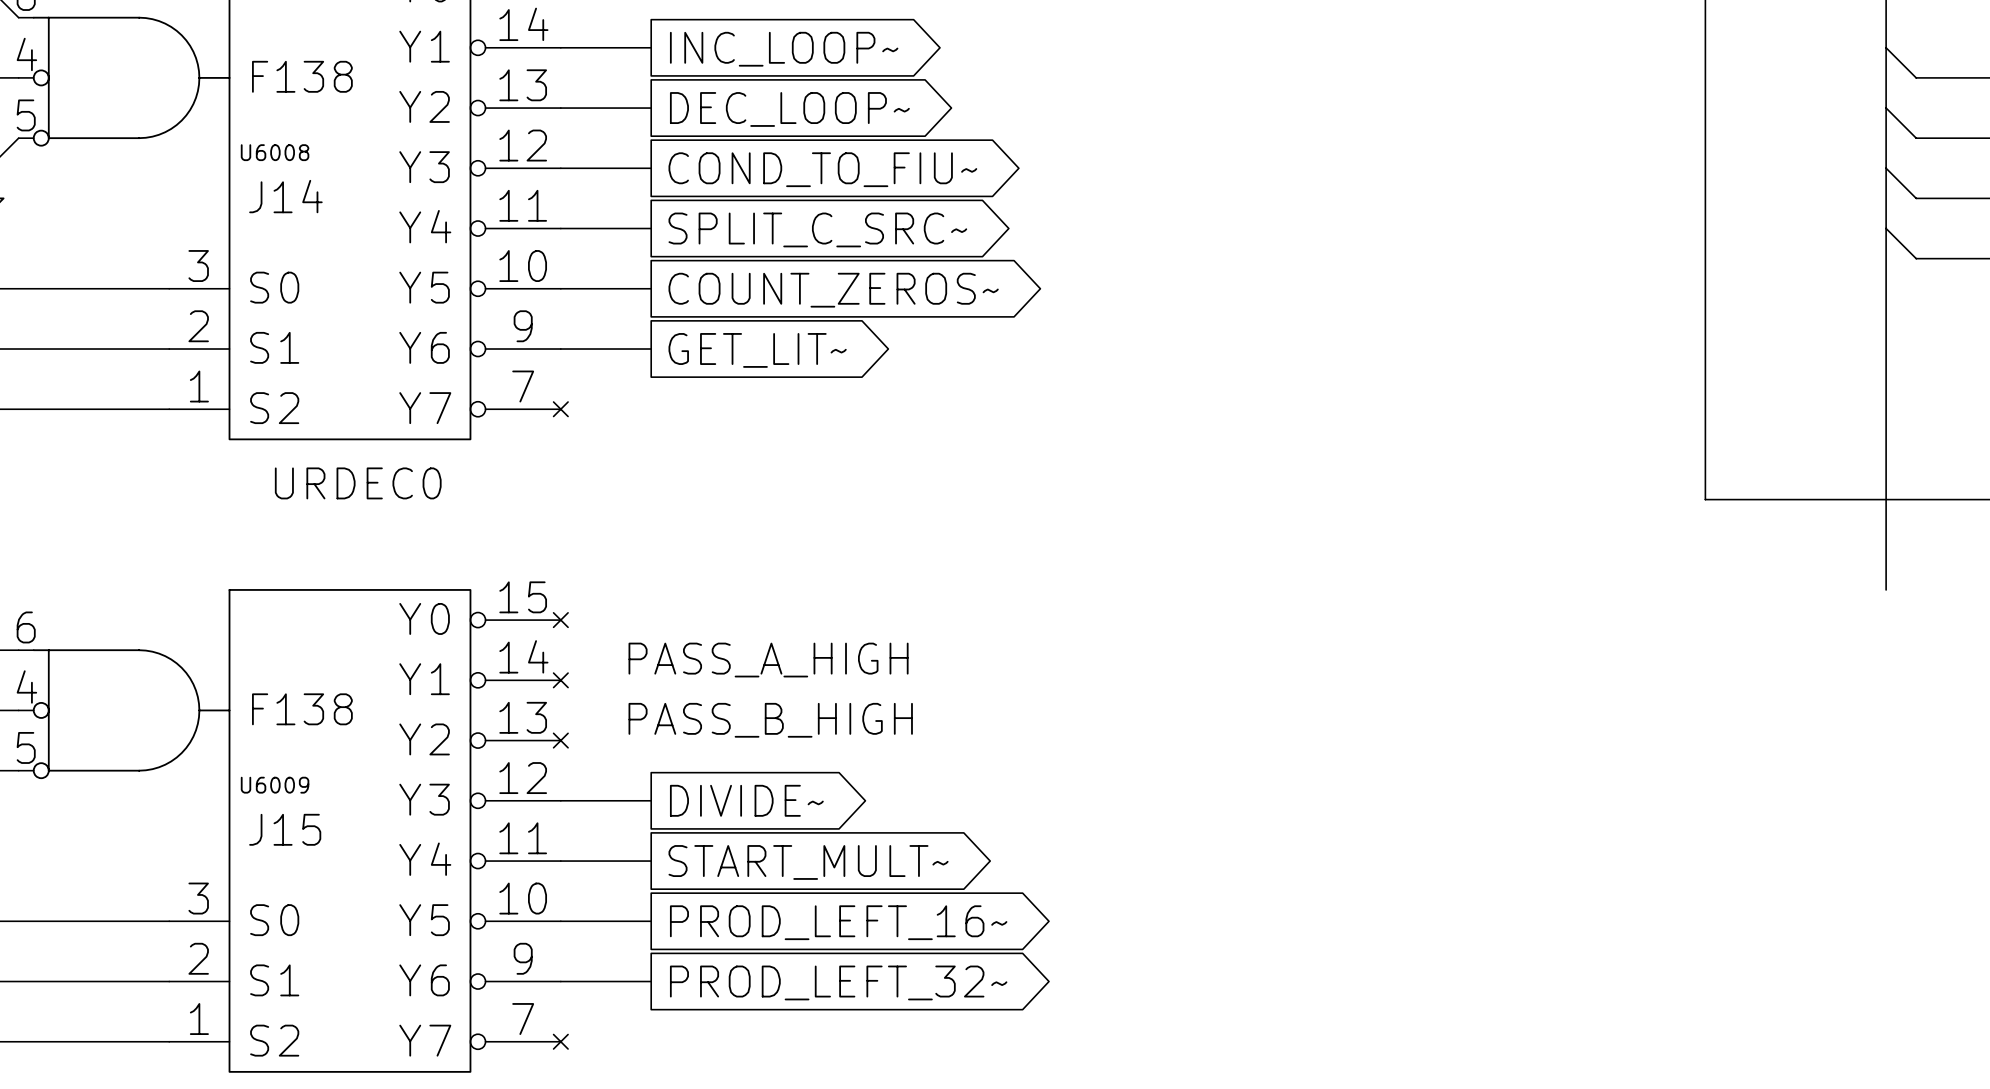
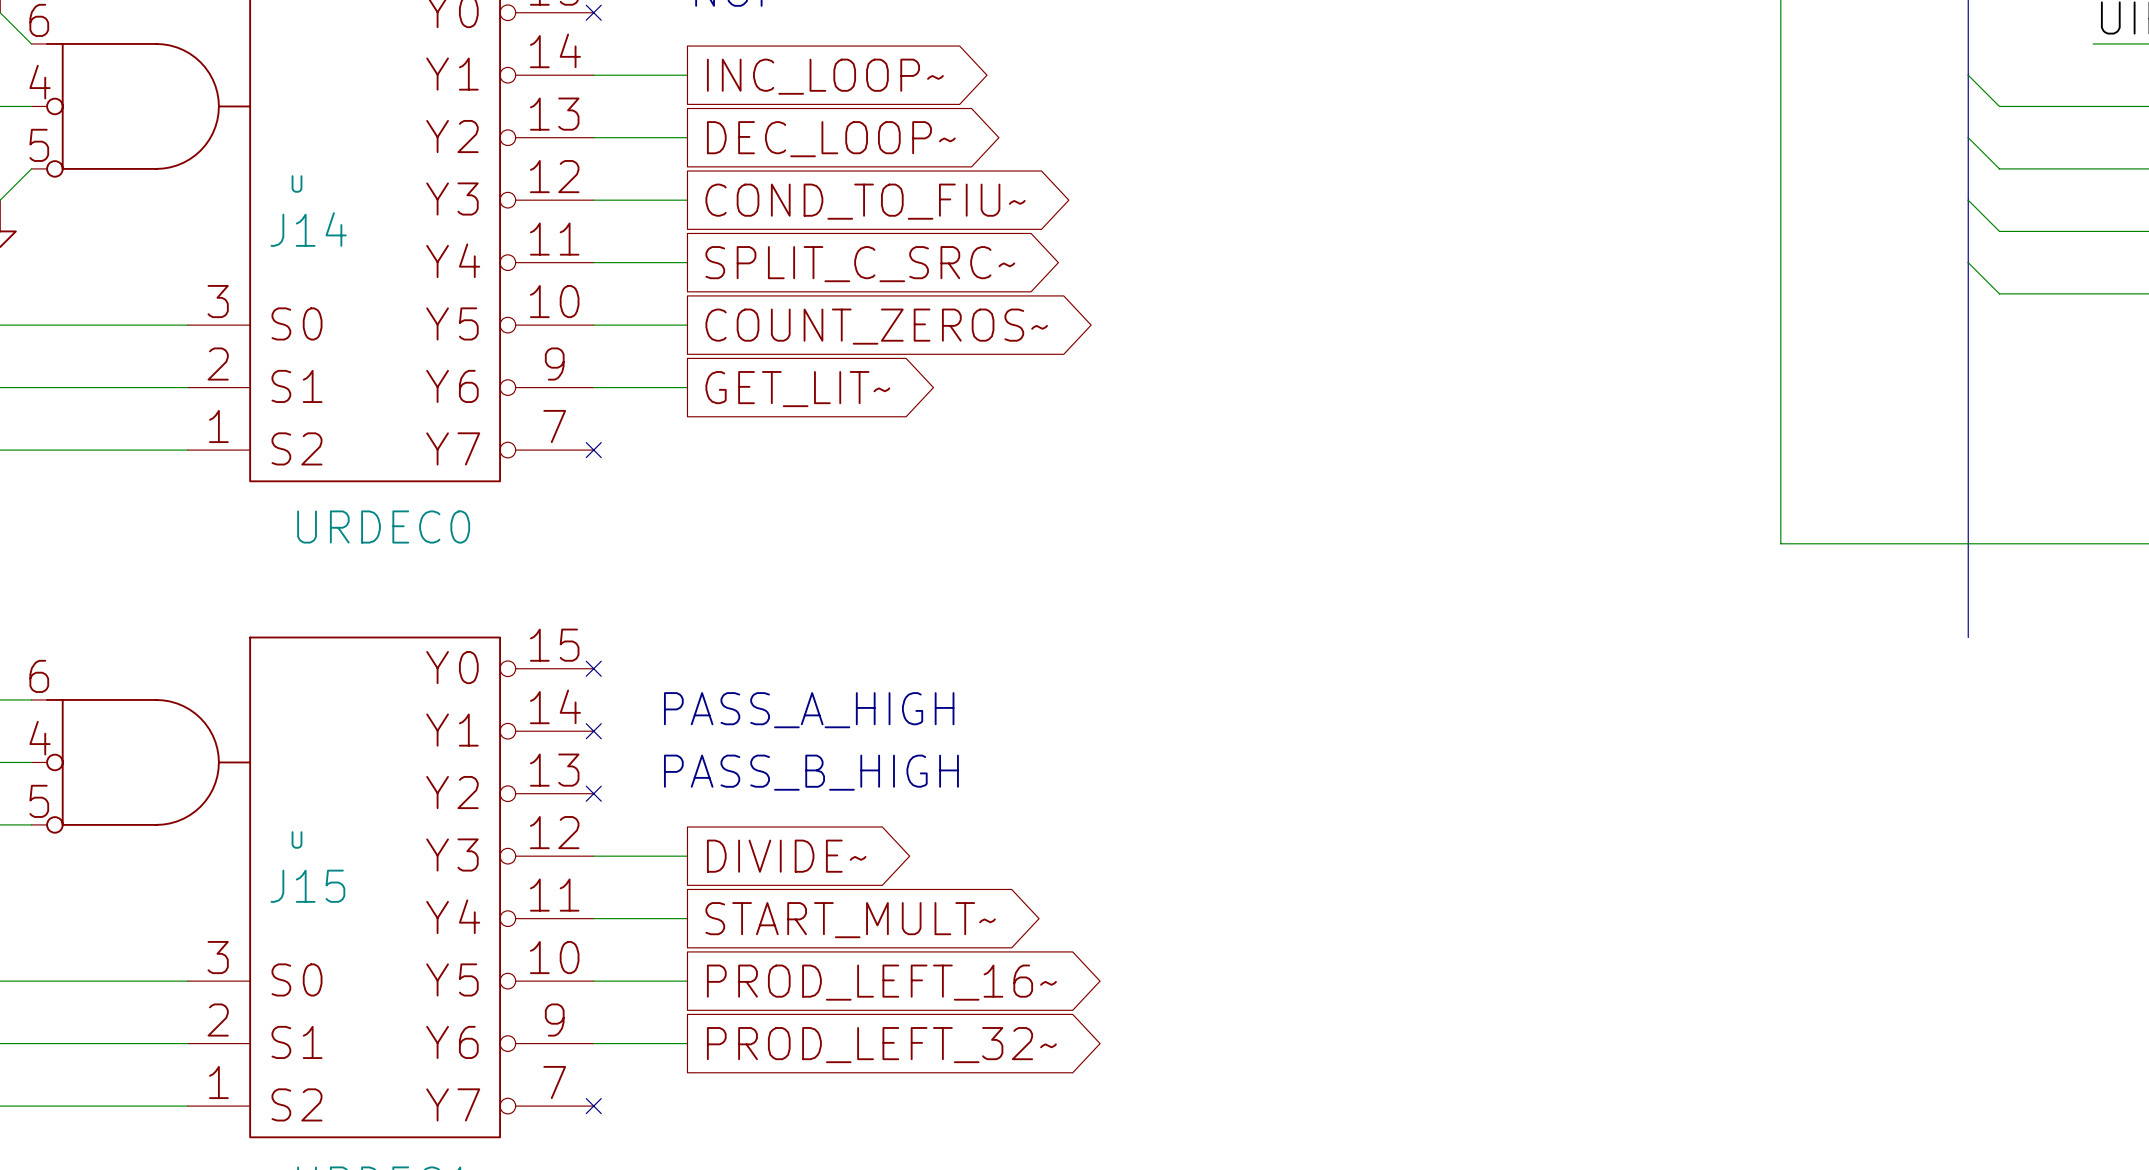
U6008 value: F138 (302, 76) -> none
U6008 name: U6008 (275, 152) -> U (297, 183)
U6009 value: F138 (302, 709) -> none
U6009 name: U6009 (275, 785) -> U (297, 839)

